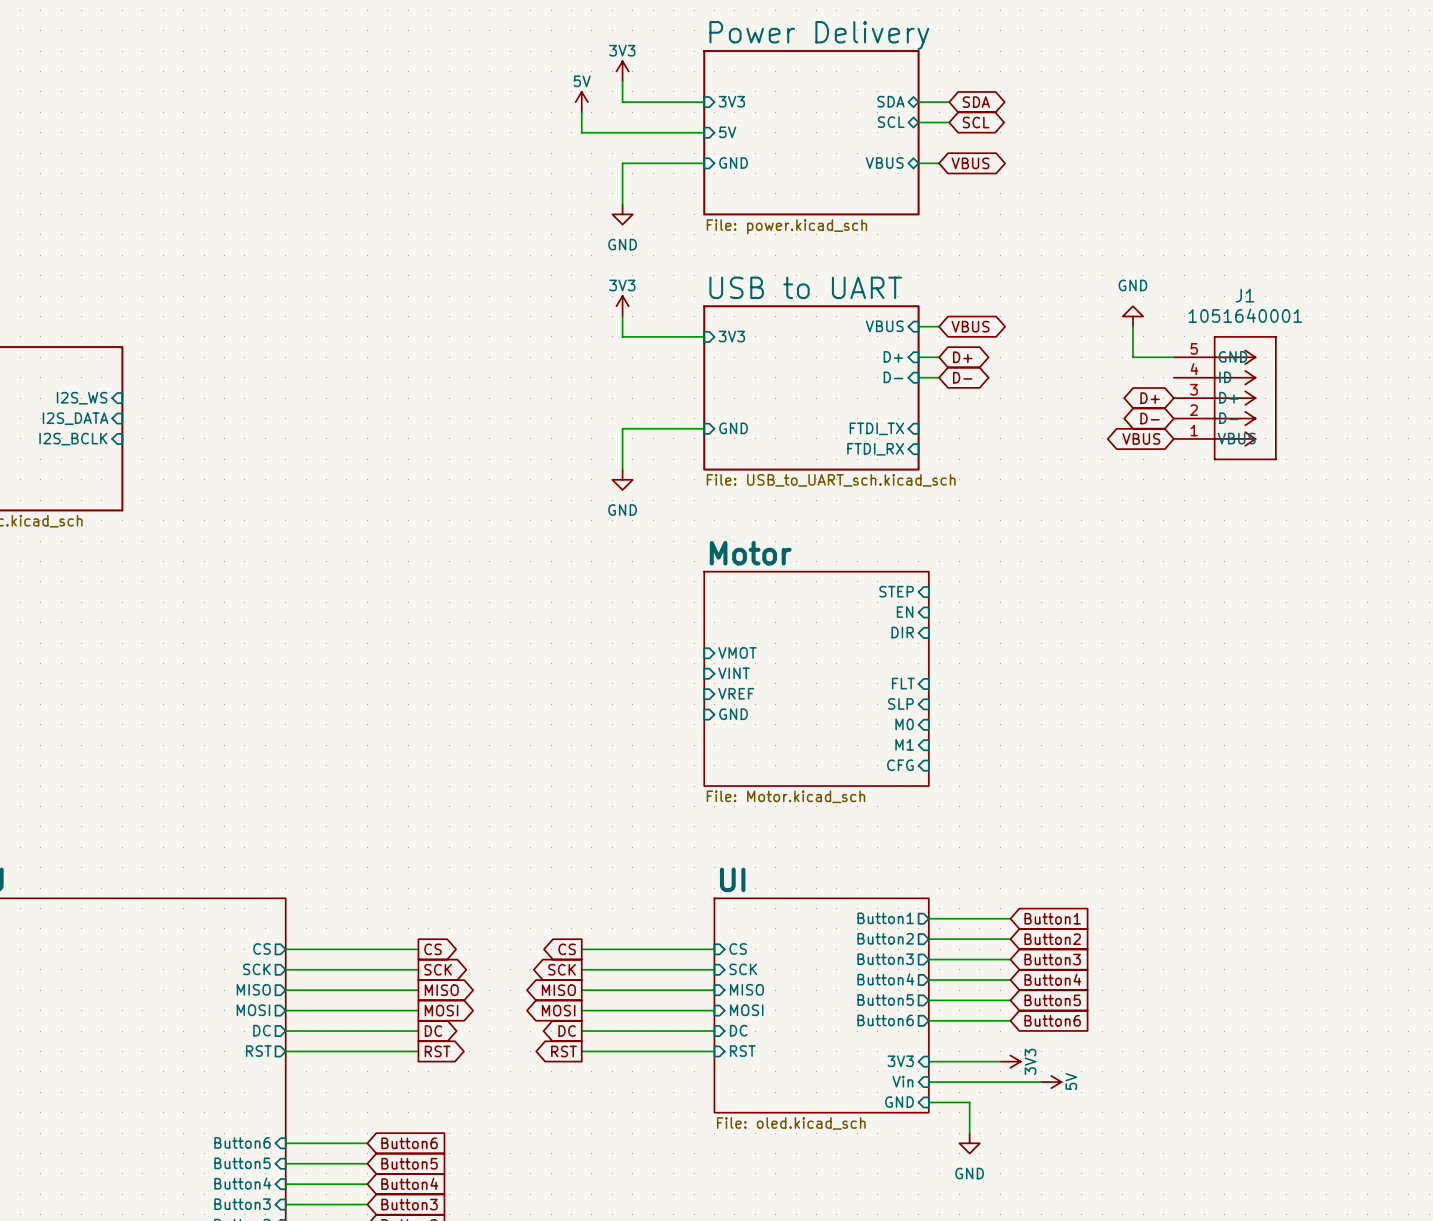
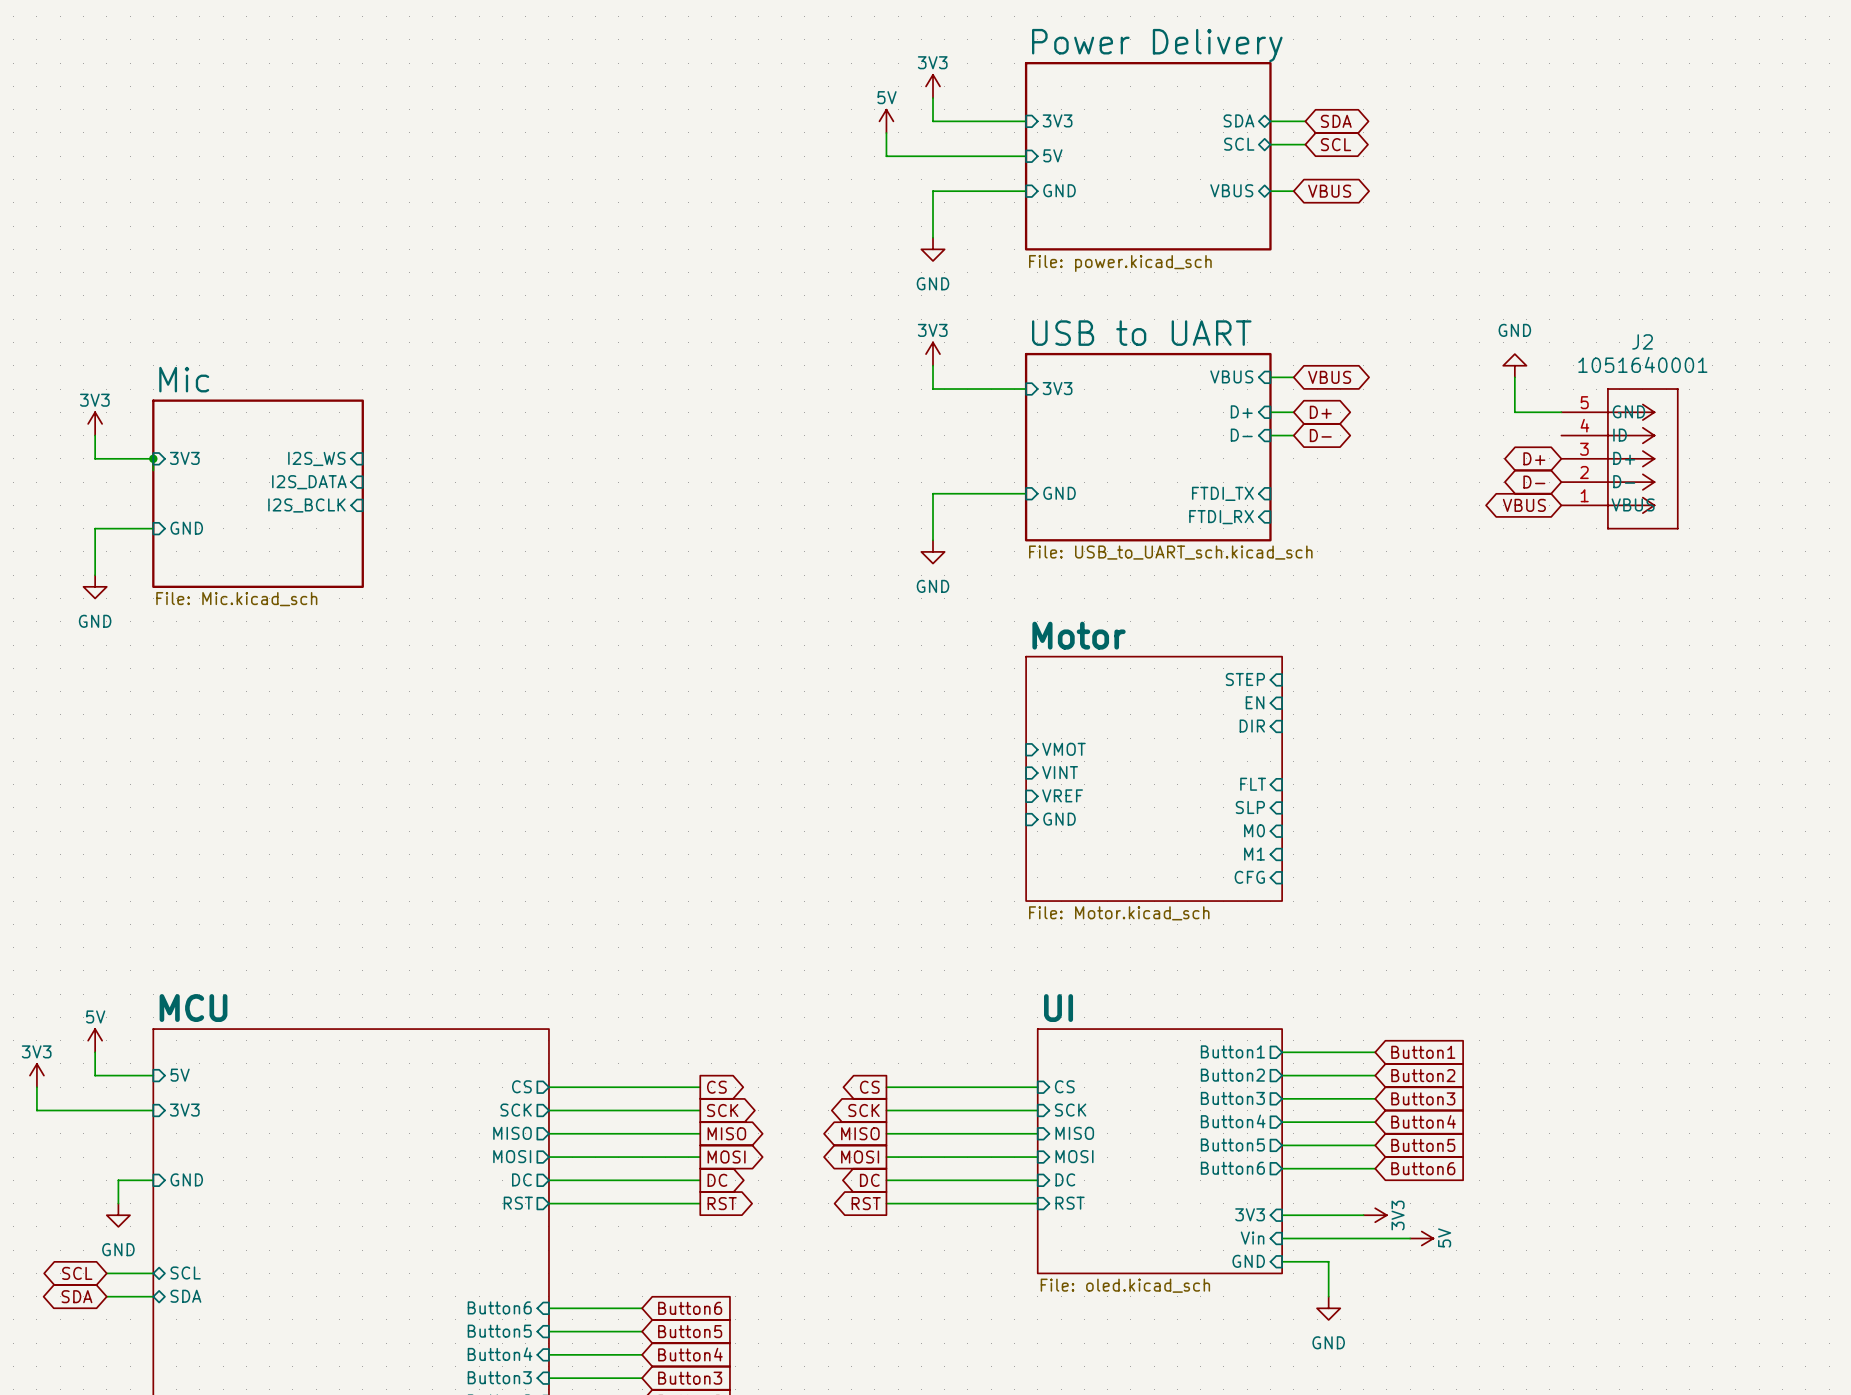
J1 name: J1 (1244, 295) -> J2 (1642, 341)

